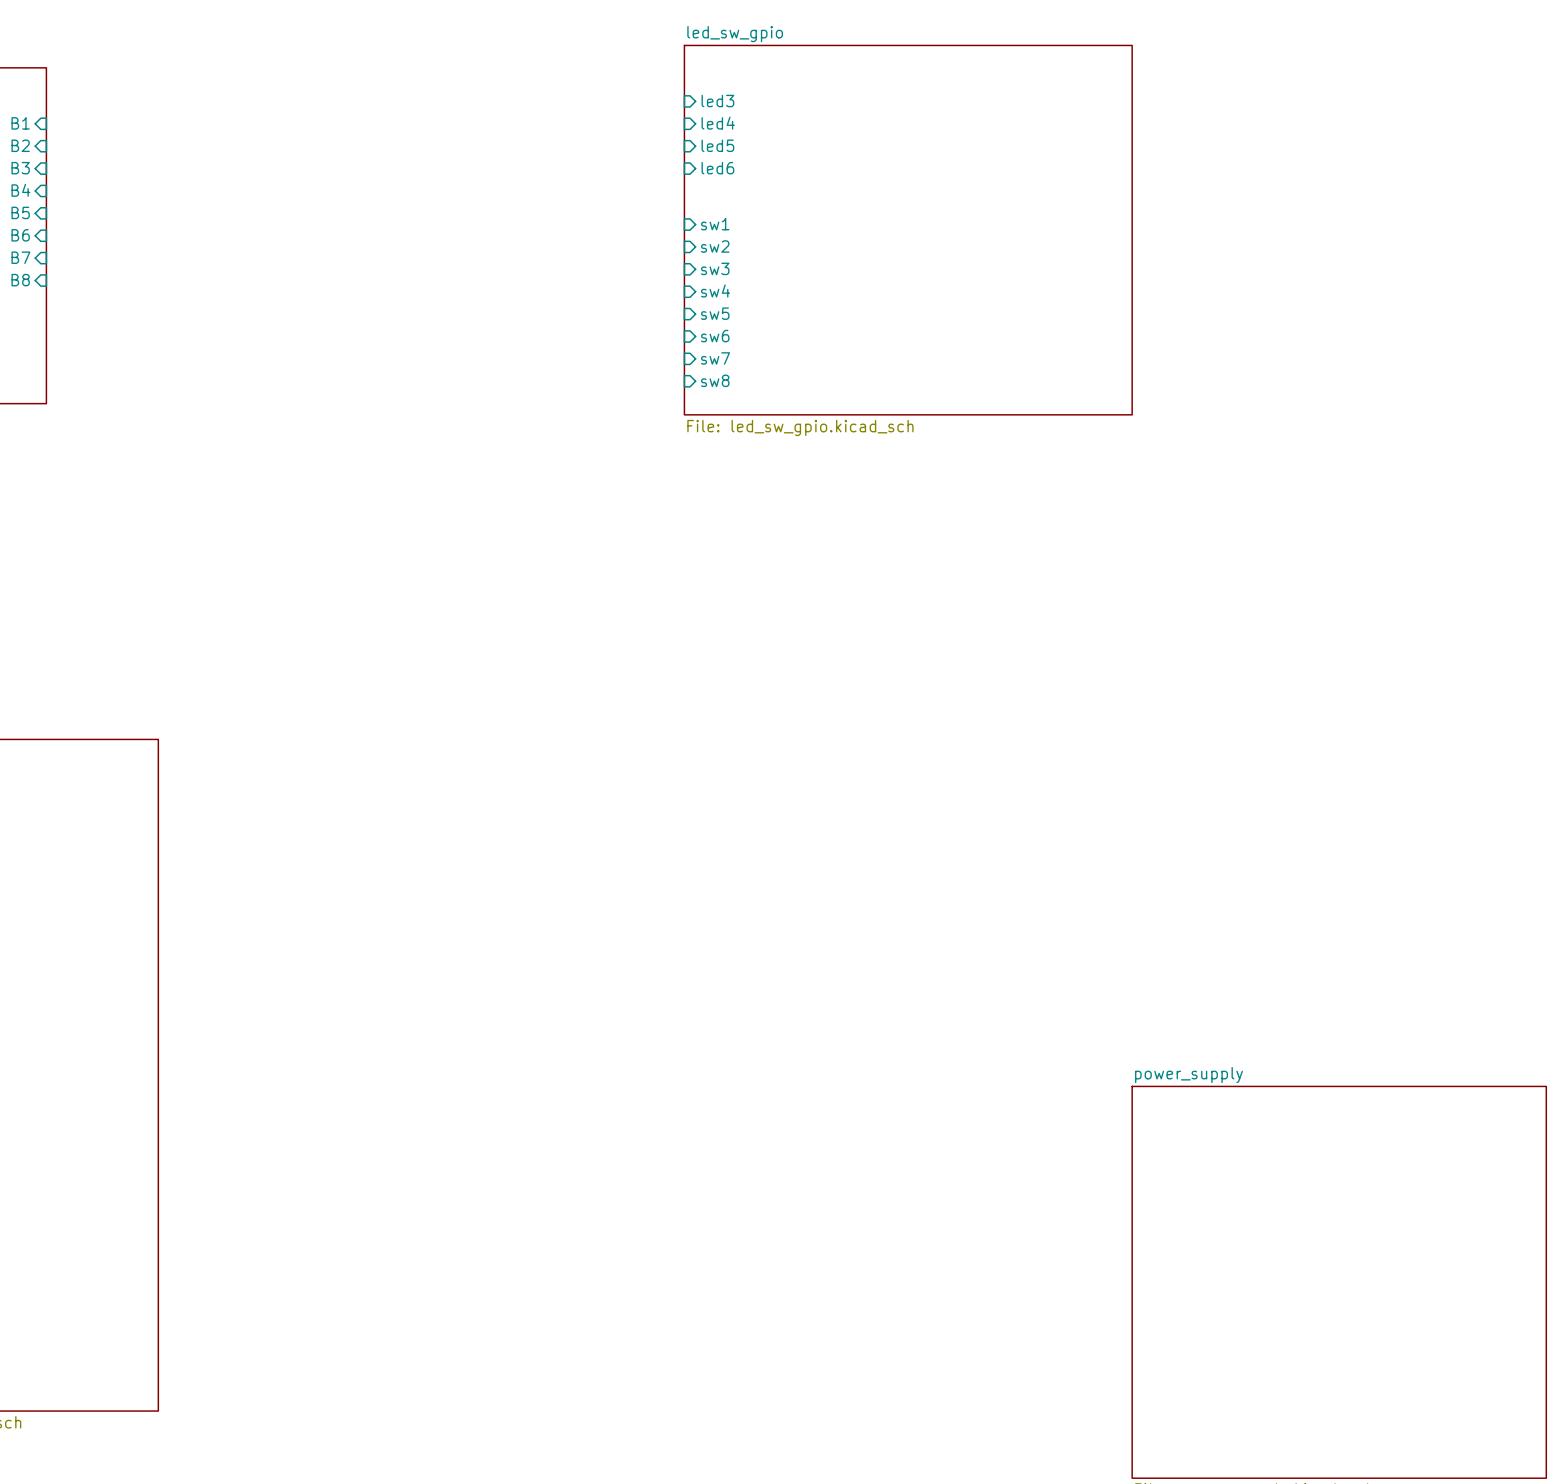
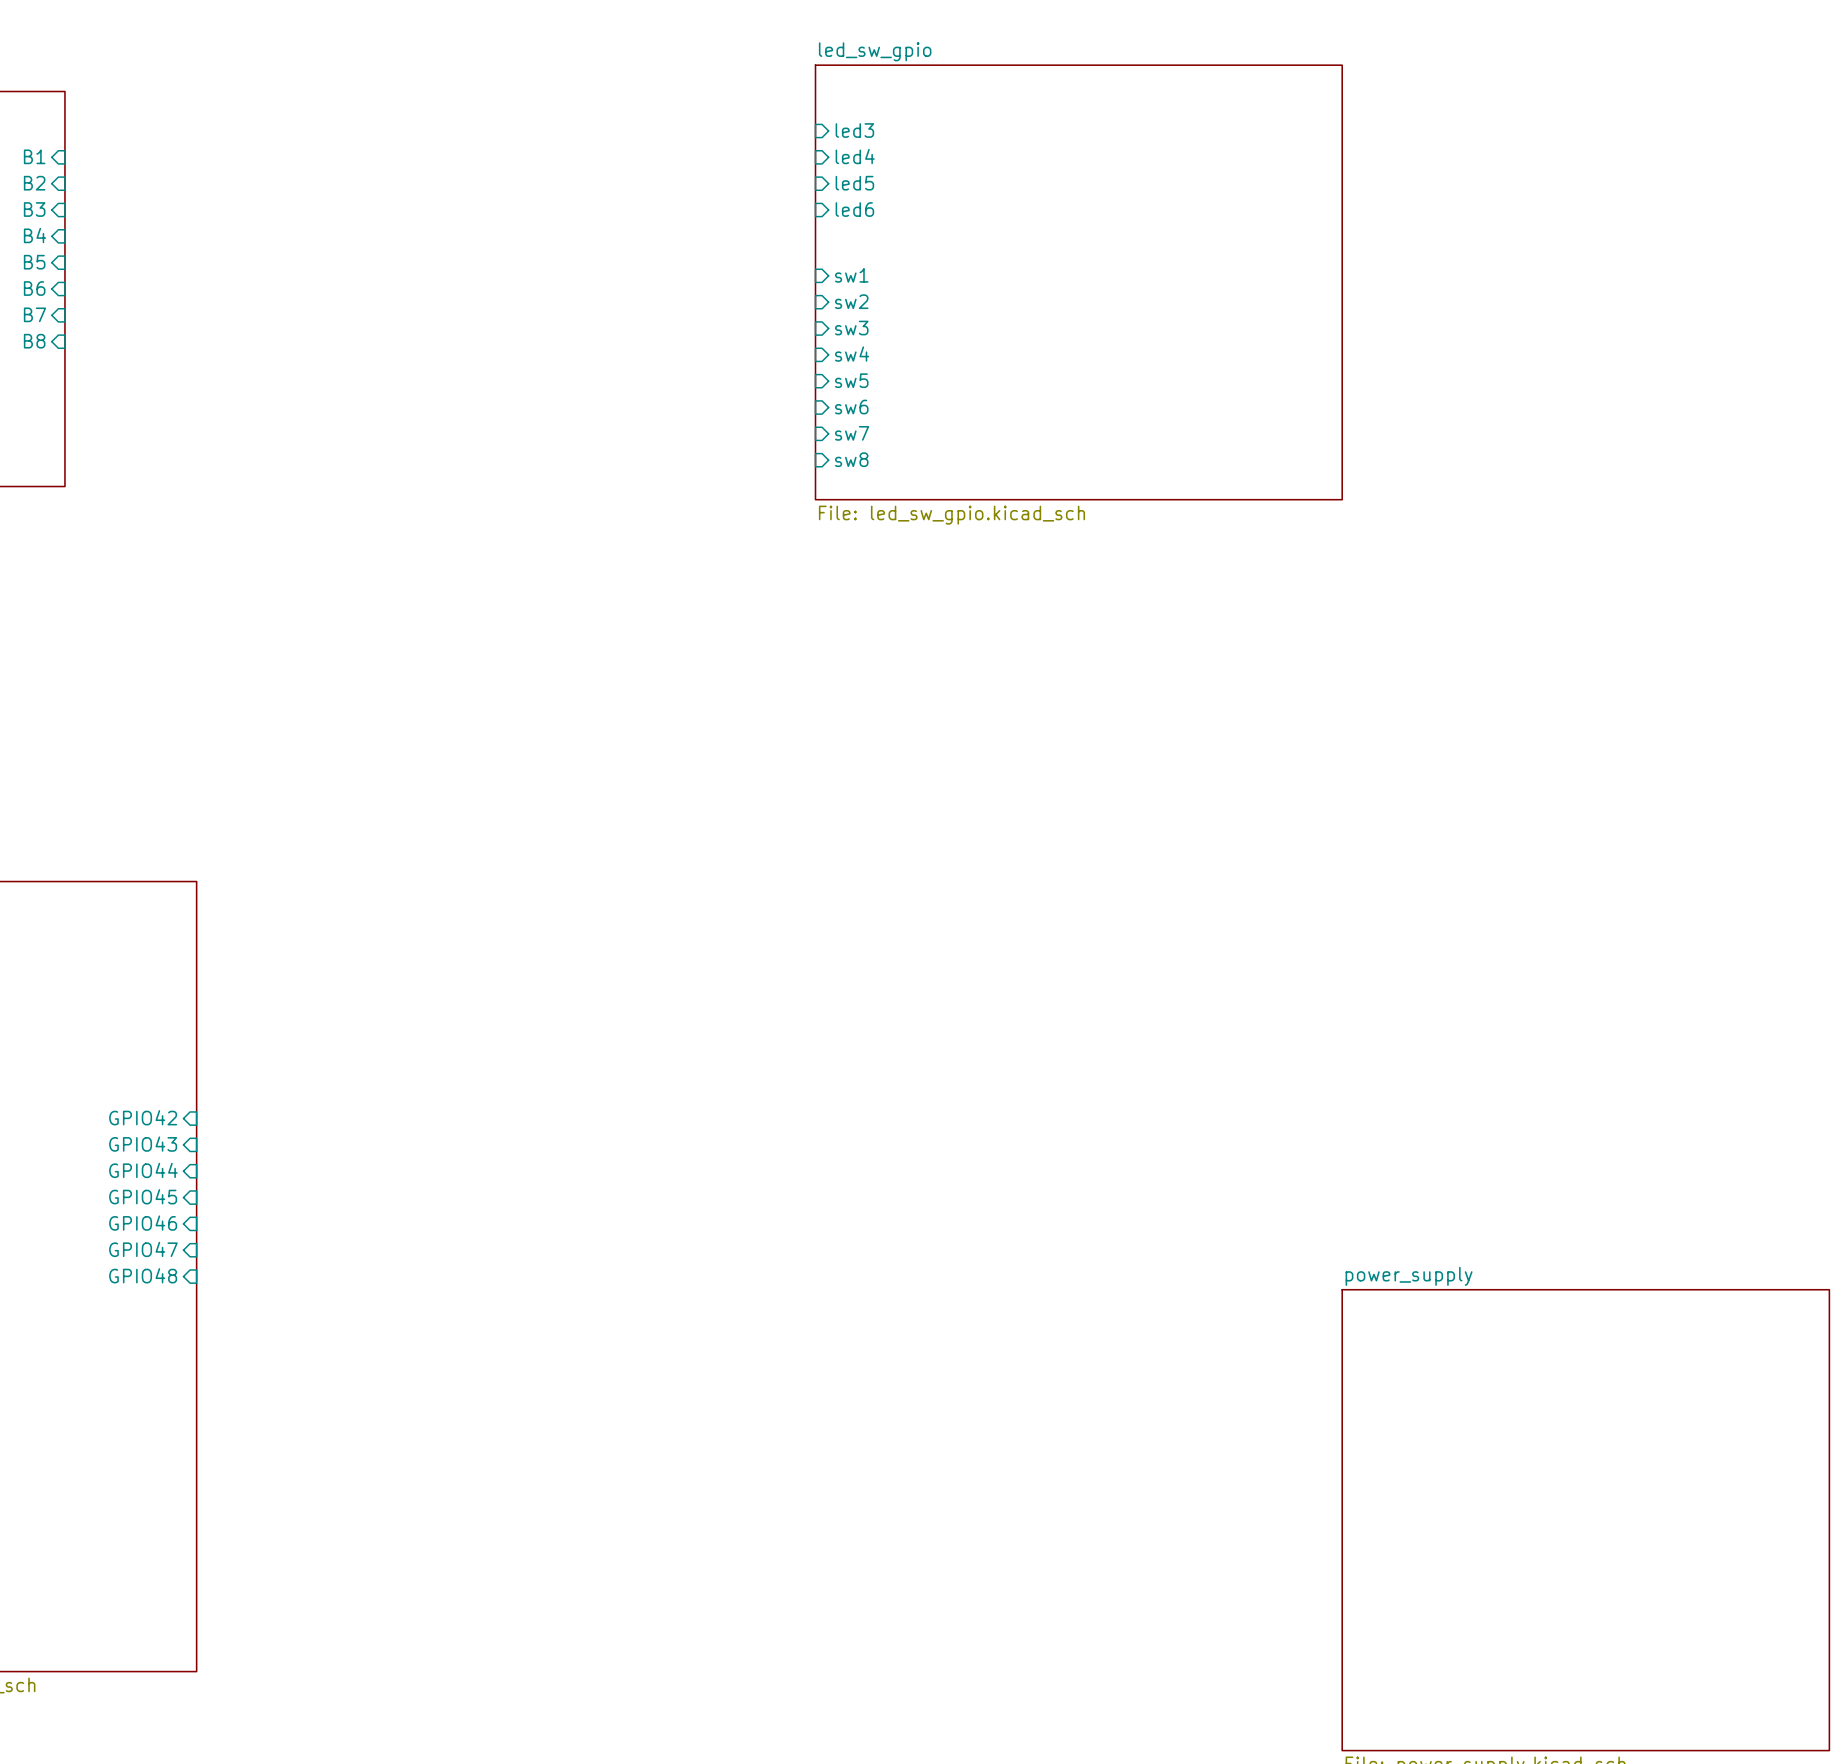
sheet pin: none -> GPIO42 (143, 1117)
sheet pin: none -> GPIO43 (143, 1144)
sheet pin: none -> GPIO44 (143, 1170)
sheet pin: none -> GPIO45 (143, 1196)
sheet pin: none -> GPIO46 (143, 1223)
sheet pin: none -> GPIO47 (143, 1249)
sheet pin: none -> GPIO48 (143, 1275)

